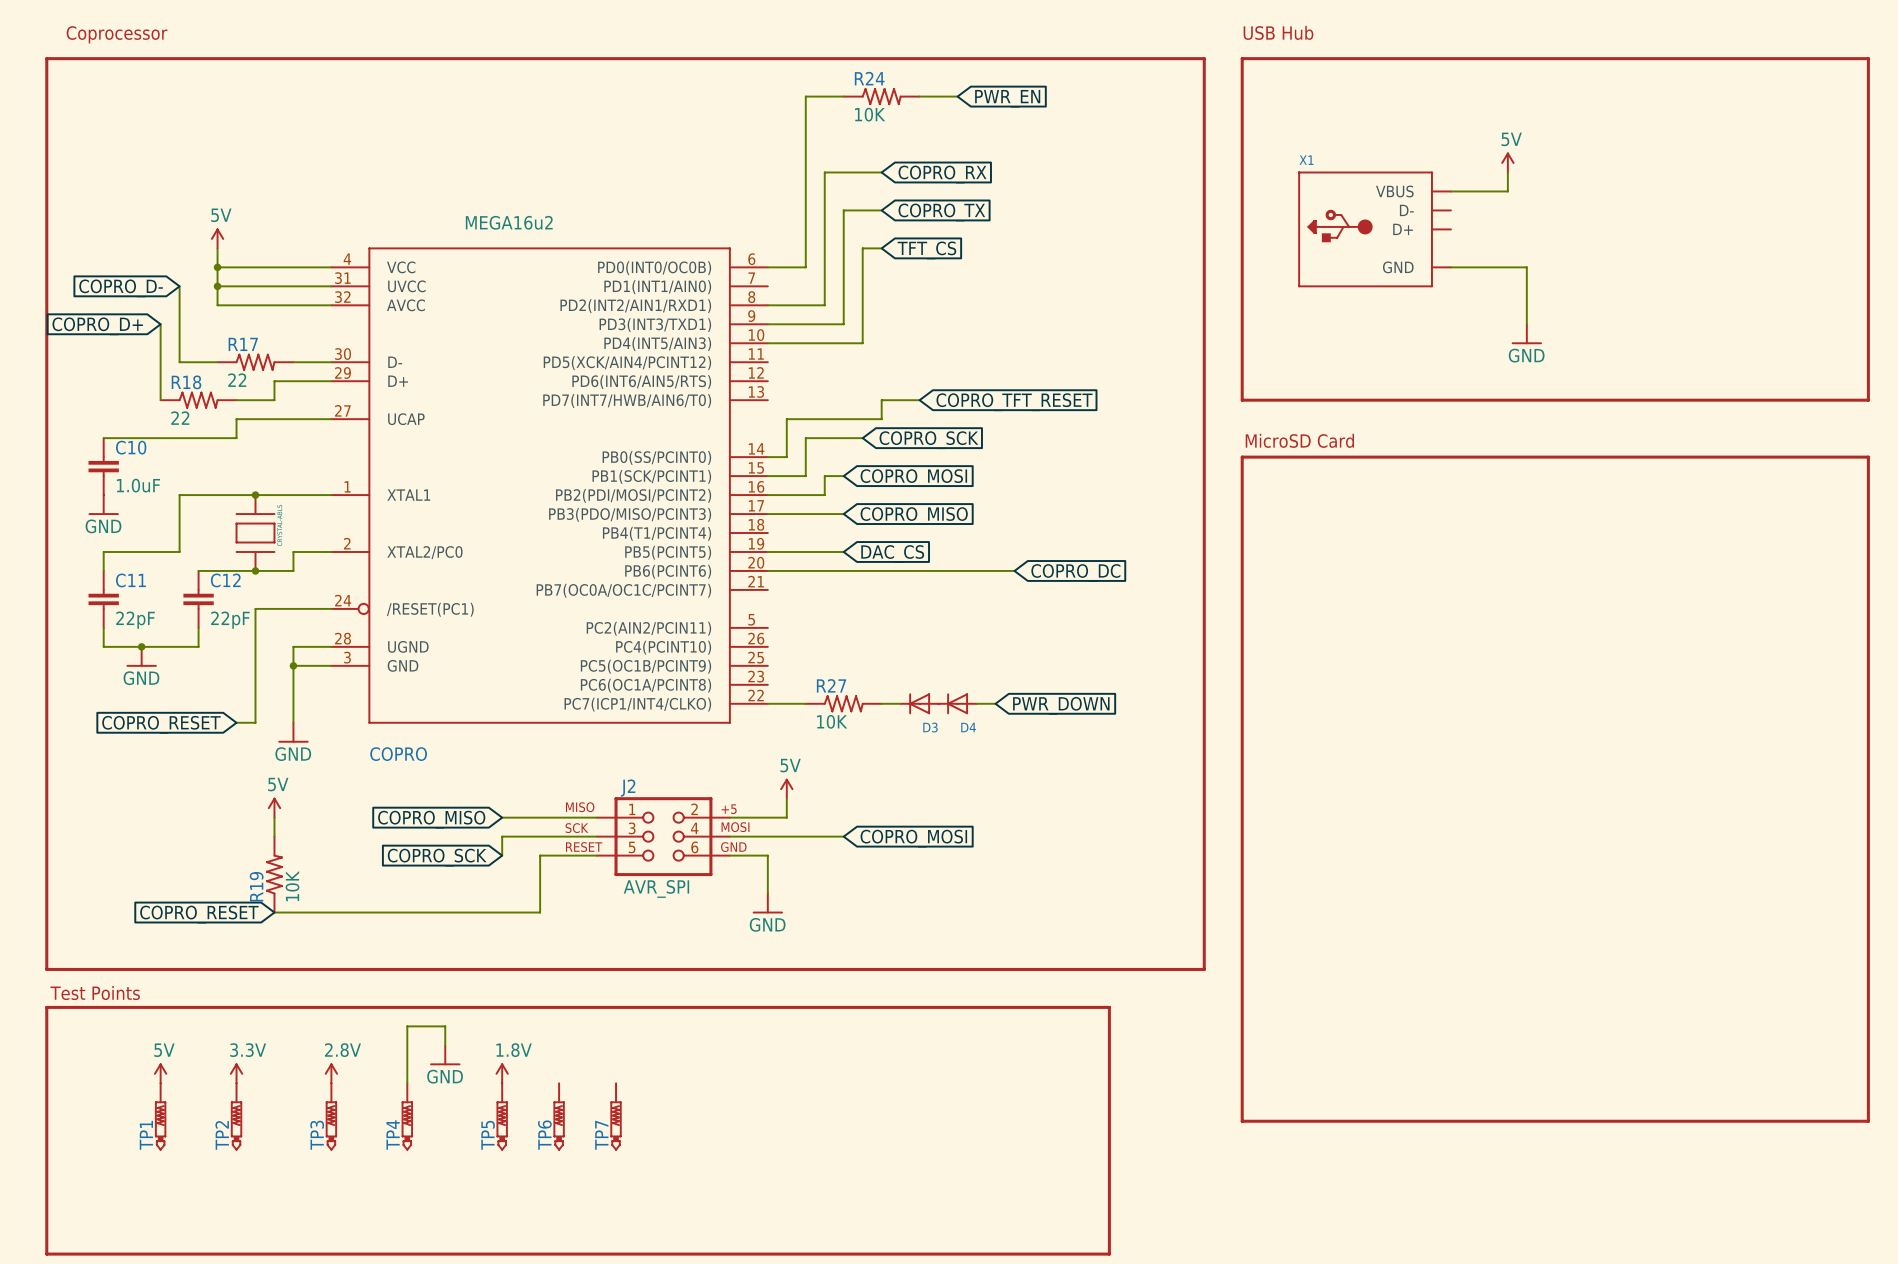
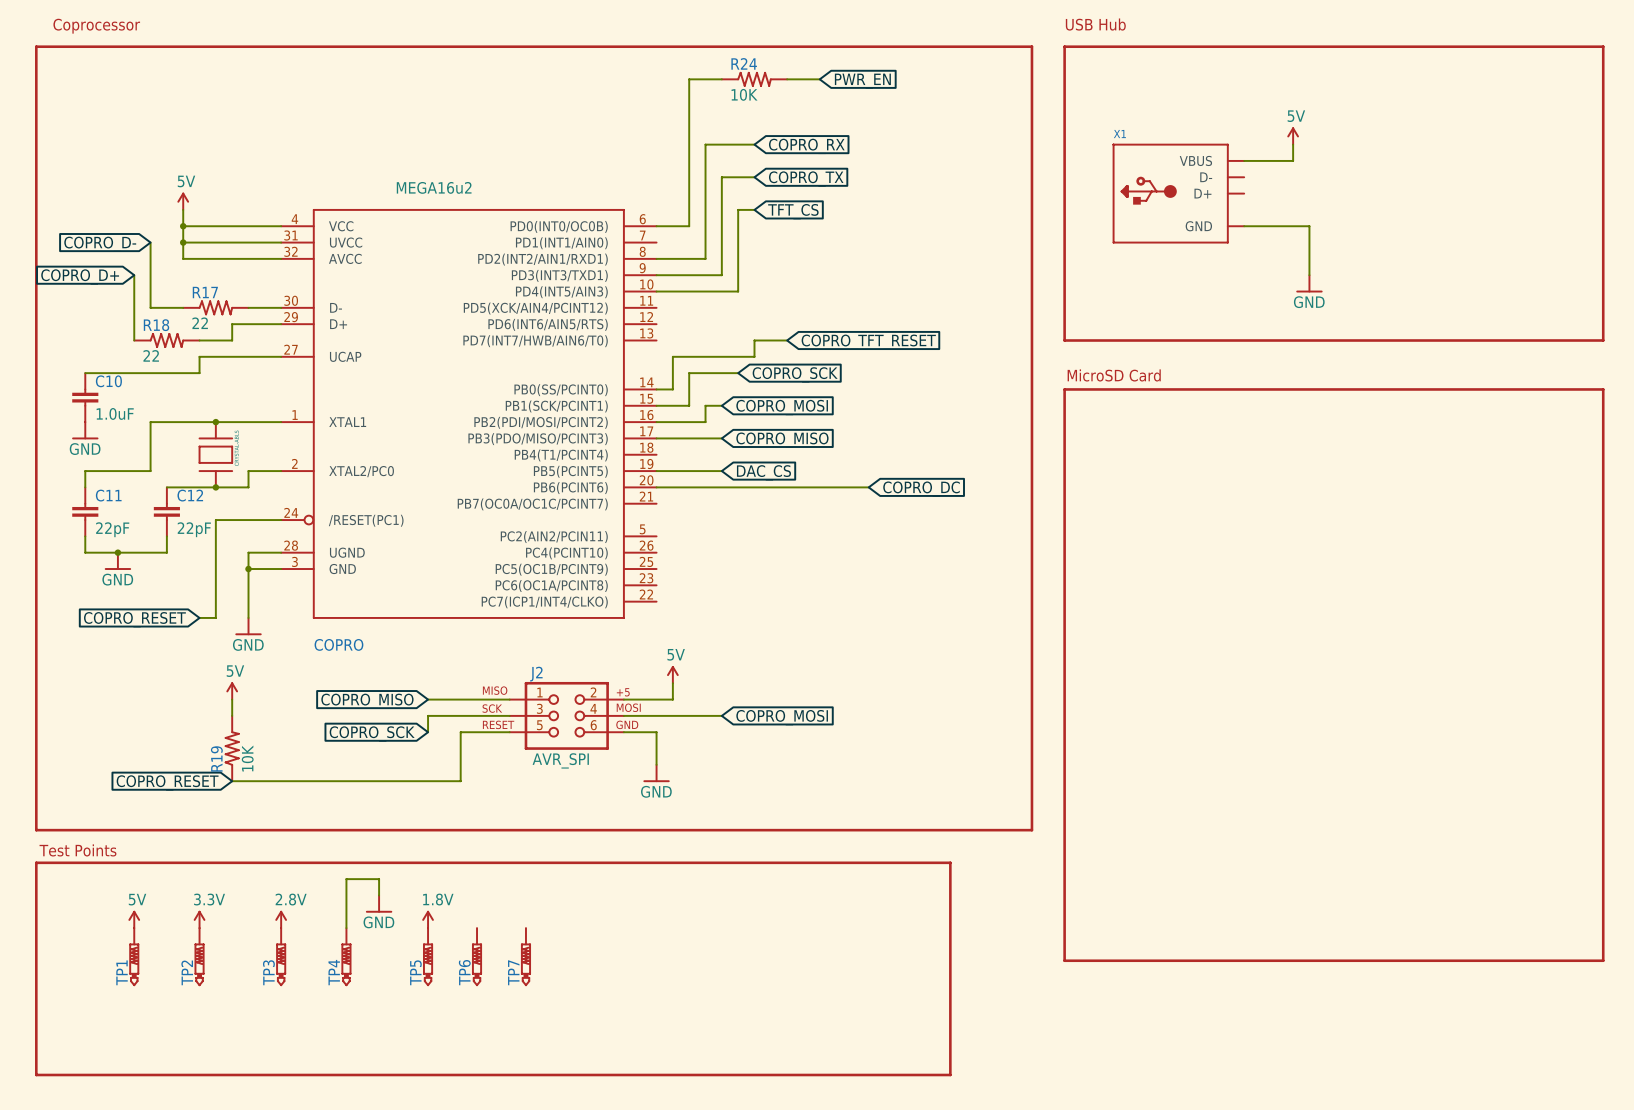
wire: (767, 703) (805, 703) -> none
R27: 10K (843, 703) -> none
wire: (881, 703) (900, 703) -> none
D3: (919, 703) -> none
D4: (957, 703) -> none
wire: (976, 703) (995, 703) -> none
global label: PWR_DOWN (1061, 705) -> none

